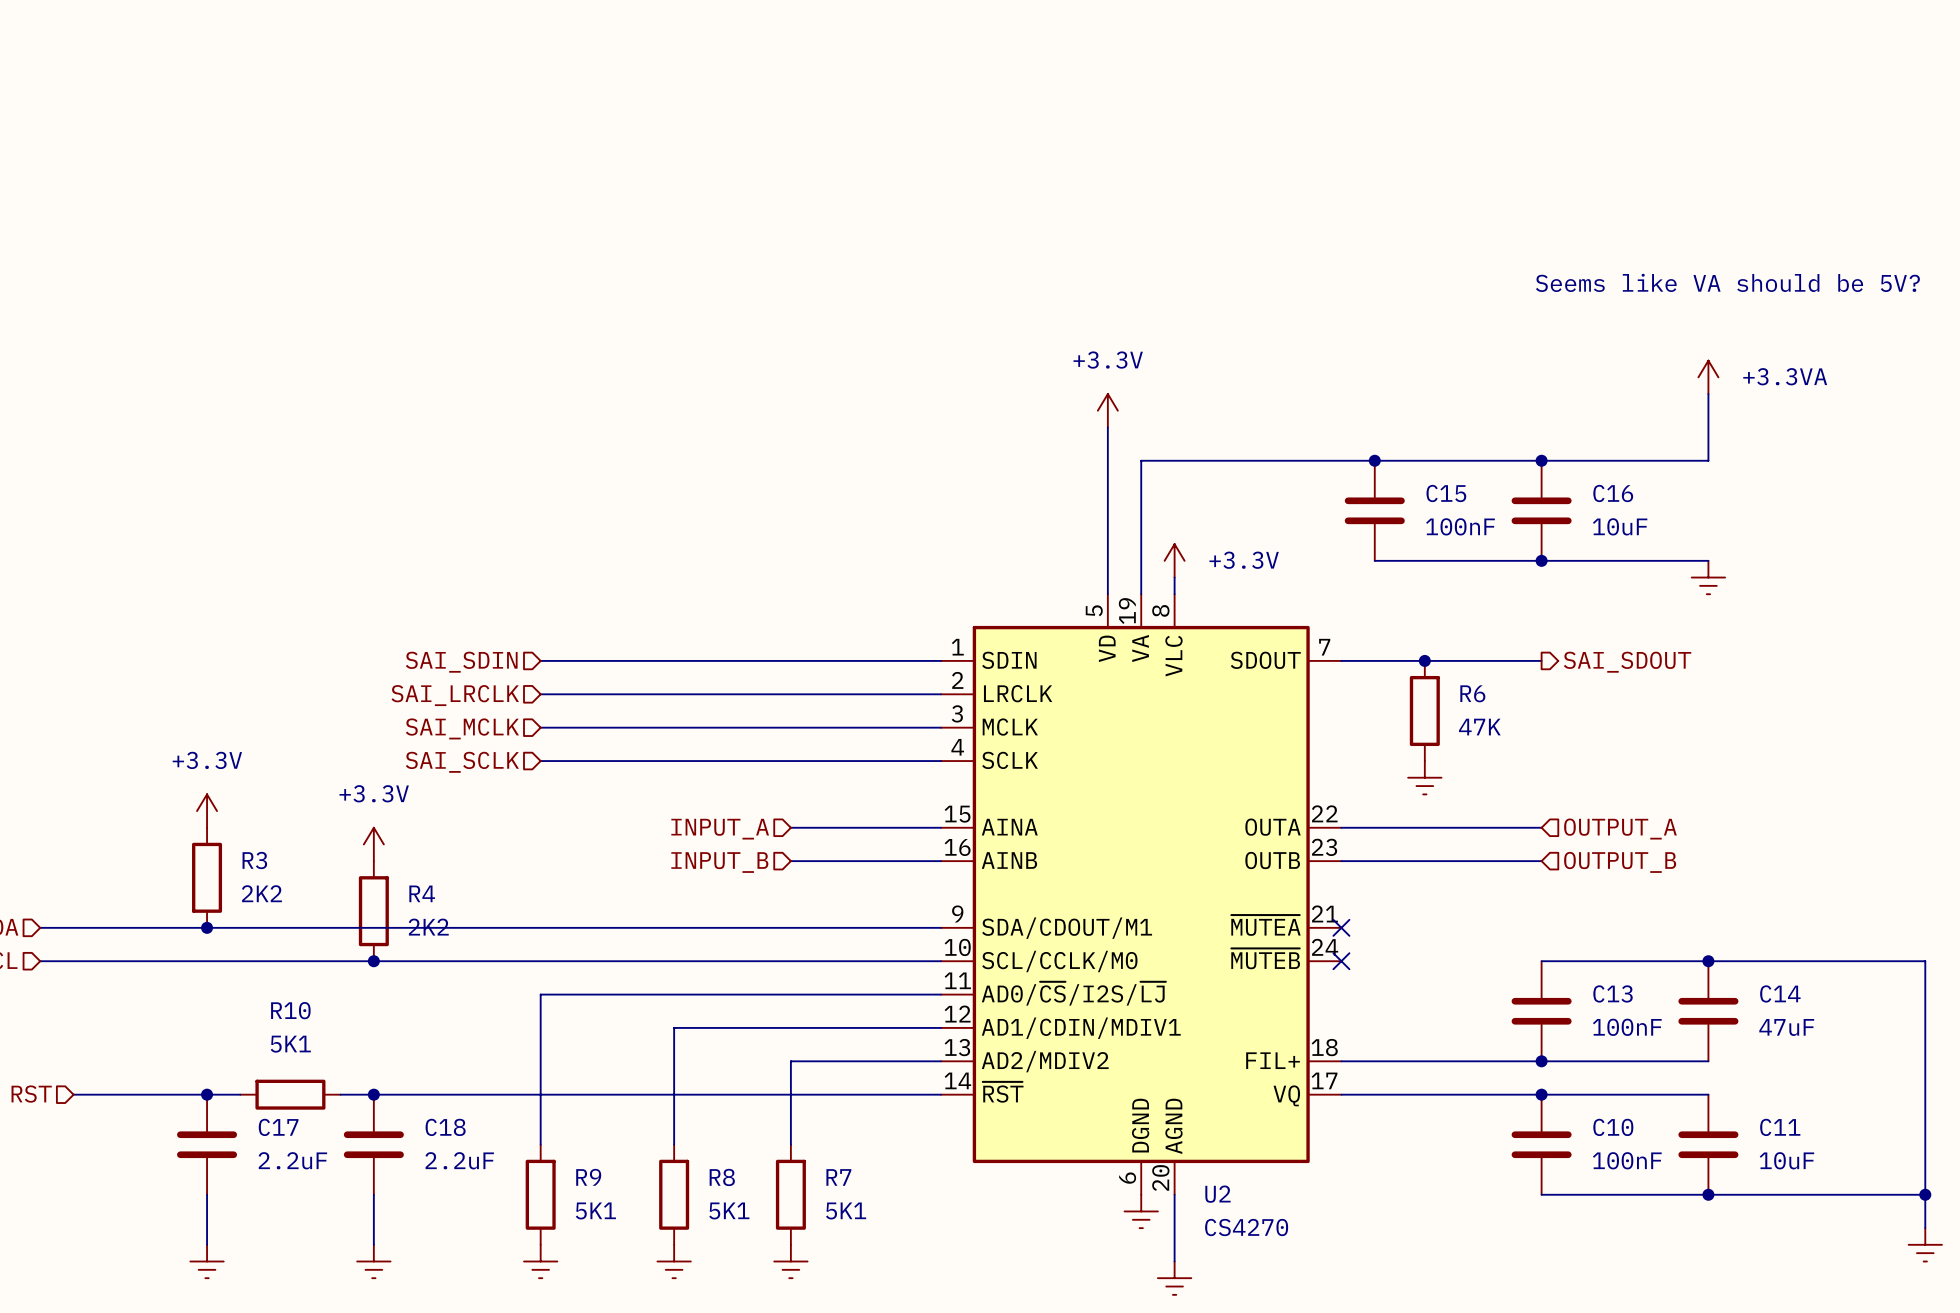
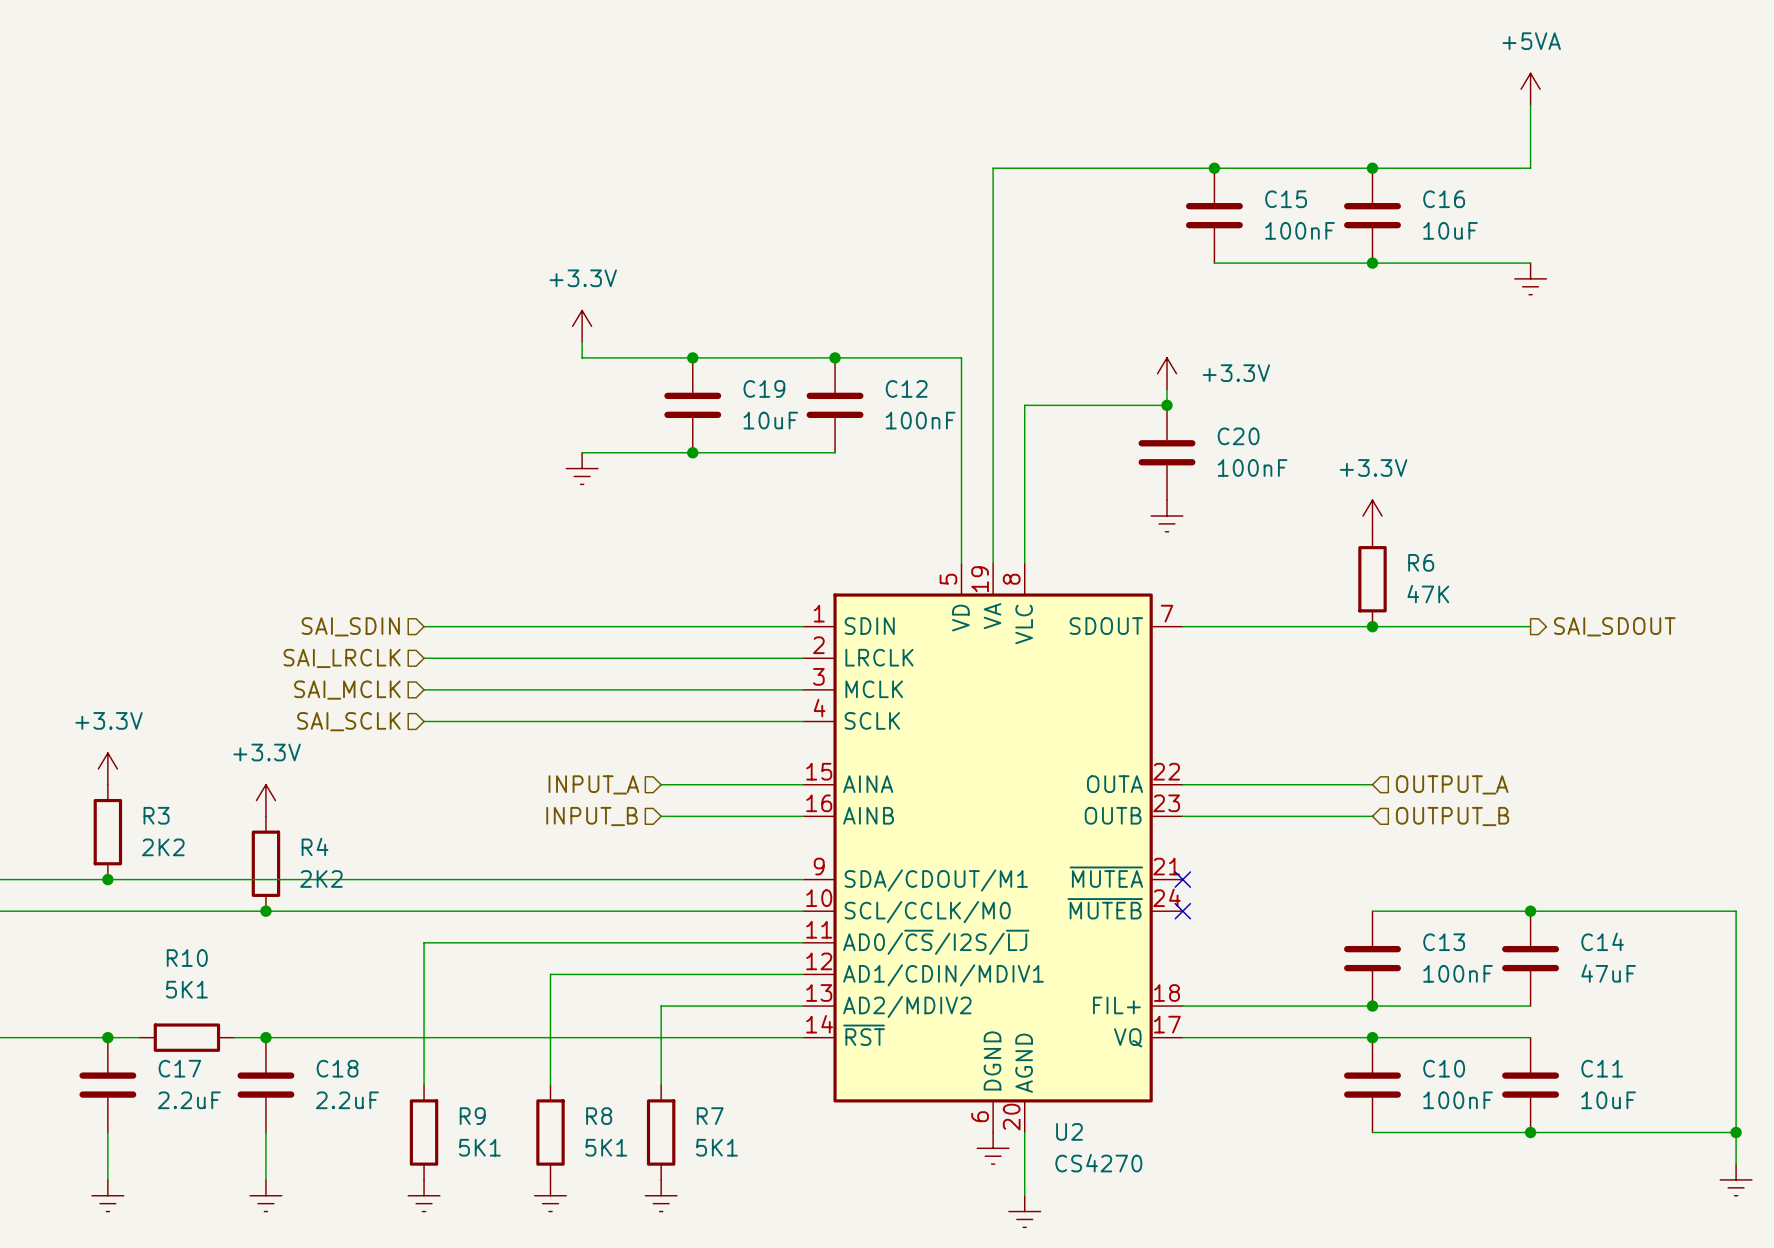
power symbol: none -> +5VA (1530, 89)
junction: none -> (1214, 168)
junction: none -> (1372, 168)
junction: none -> (1372, 263)
text: Seems like VA should be 5V? (1727, 282) -> none
power symbol: none -> (1530, 278)
power symbol: none -> +3.3V (582, 326)
wire: none -> (582, 342) (582, 357) (961, 357) (961, 405)
junction: none -> (692, 357)
junction: none -> (835, 357)
power symbol: +3.3VA (1708, 377) -> none
power symbol: none -> +3.3V (1167, 373)
wire: (1708, 394) (1708, 460) (1141, 460) -> (1530, 105) (1530, 168) (993, 168) (993, 436)
power symbol: +3.3V (1107, 410) -> none
wire: none -> (1167, 389) (1167, 405) (1024, 405) (1024, 547)
C19: none -> 10uF (692, 405)
C12: none -> 100nF (835, 405)
junction position: (1374, 460) -> (1167, 405)
junction: (1541, 460) -> none
wire: none -> (582, 452) (835, 452)
junction: none -> (692, 452)
C20: none -> 100nF (1167, 452)
power symbol: none -> (582, 468)
C15 position: (1374, 510) -> (1214, 215)
C16 position: (1541, 510) -> (1372, 215)
power symbol: none -> (1167, 516)
power symbol: none -> +3.3V (1372, 516)
power symbol: +3.3V (1174, 560) -> none
wire: (1374, 560) (1708, 560) -> (1214, 263) (1530, 263)
junction: (1541, 560) -> none
power symbol: (1708, 577) -> none
junction: (1424, 660) -> none
wire: none -> (1372, 626) (1530, 626)
junction: none -> (1372, 626)
hierarchical label position: SAI_SDOUT (1627, 662) -> SAI_SDOUT (1614, 626)
R6 position: (1424, 710) -> (1372, 579)
power symbol: (1424, 777) -> none

